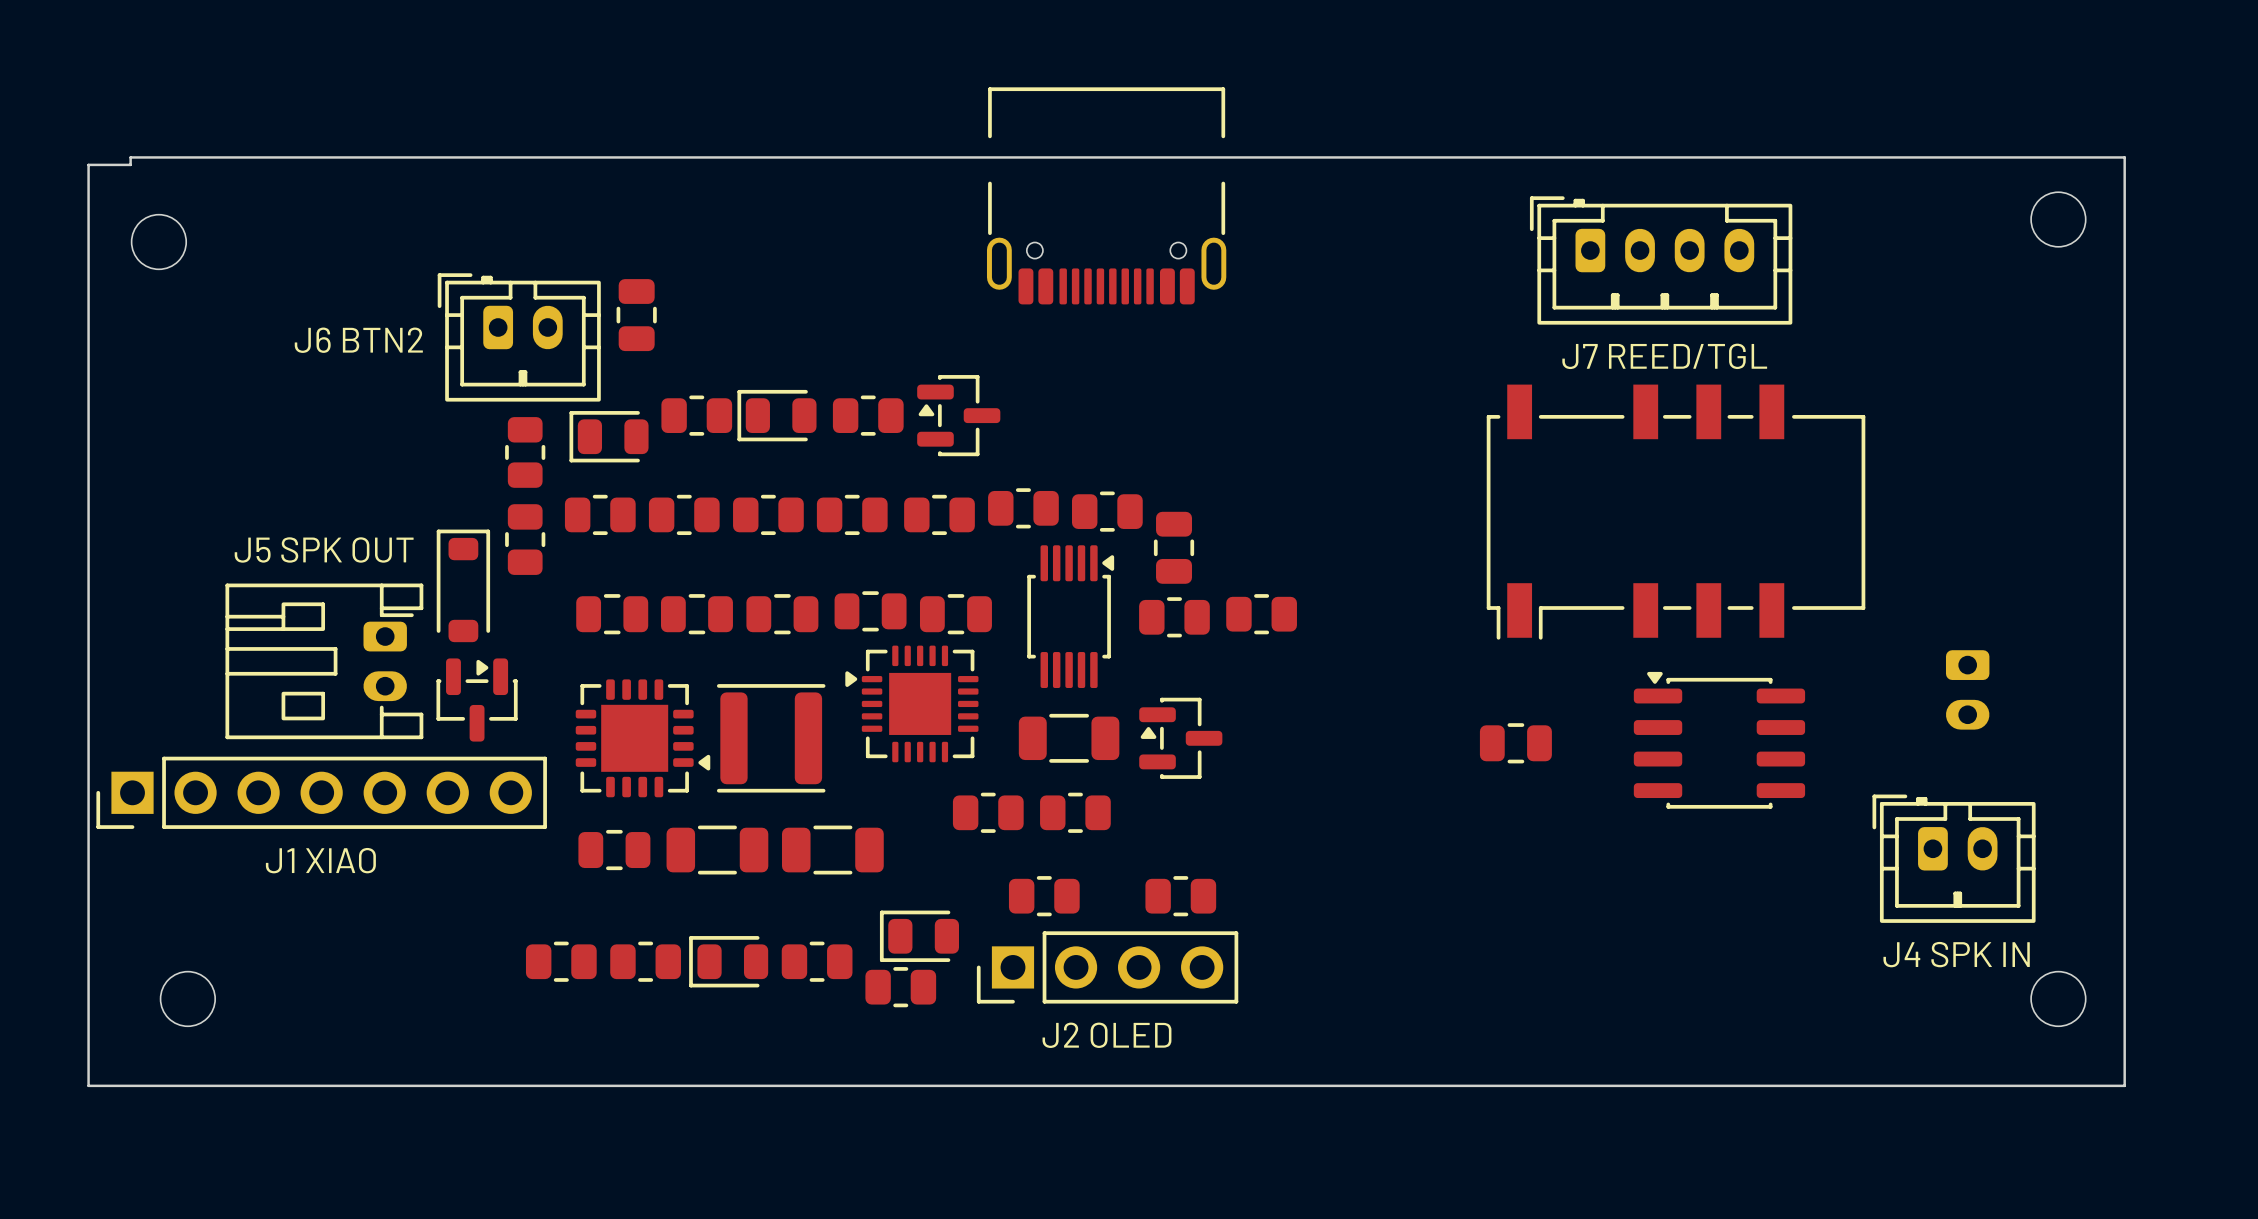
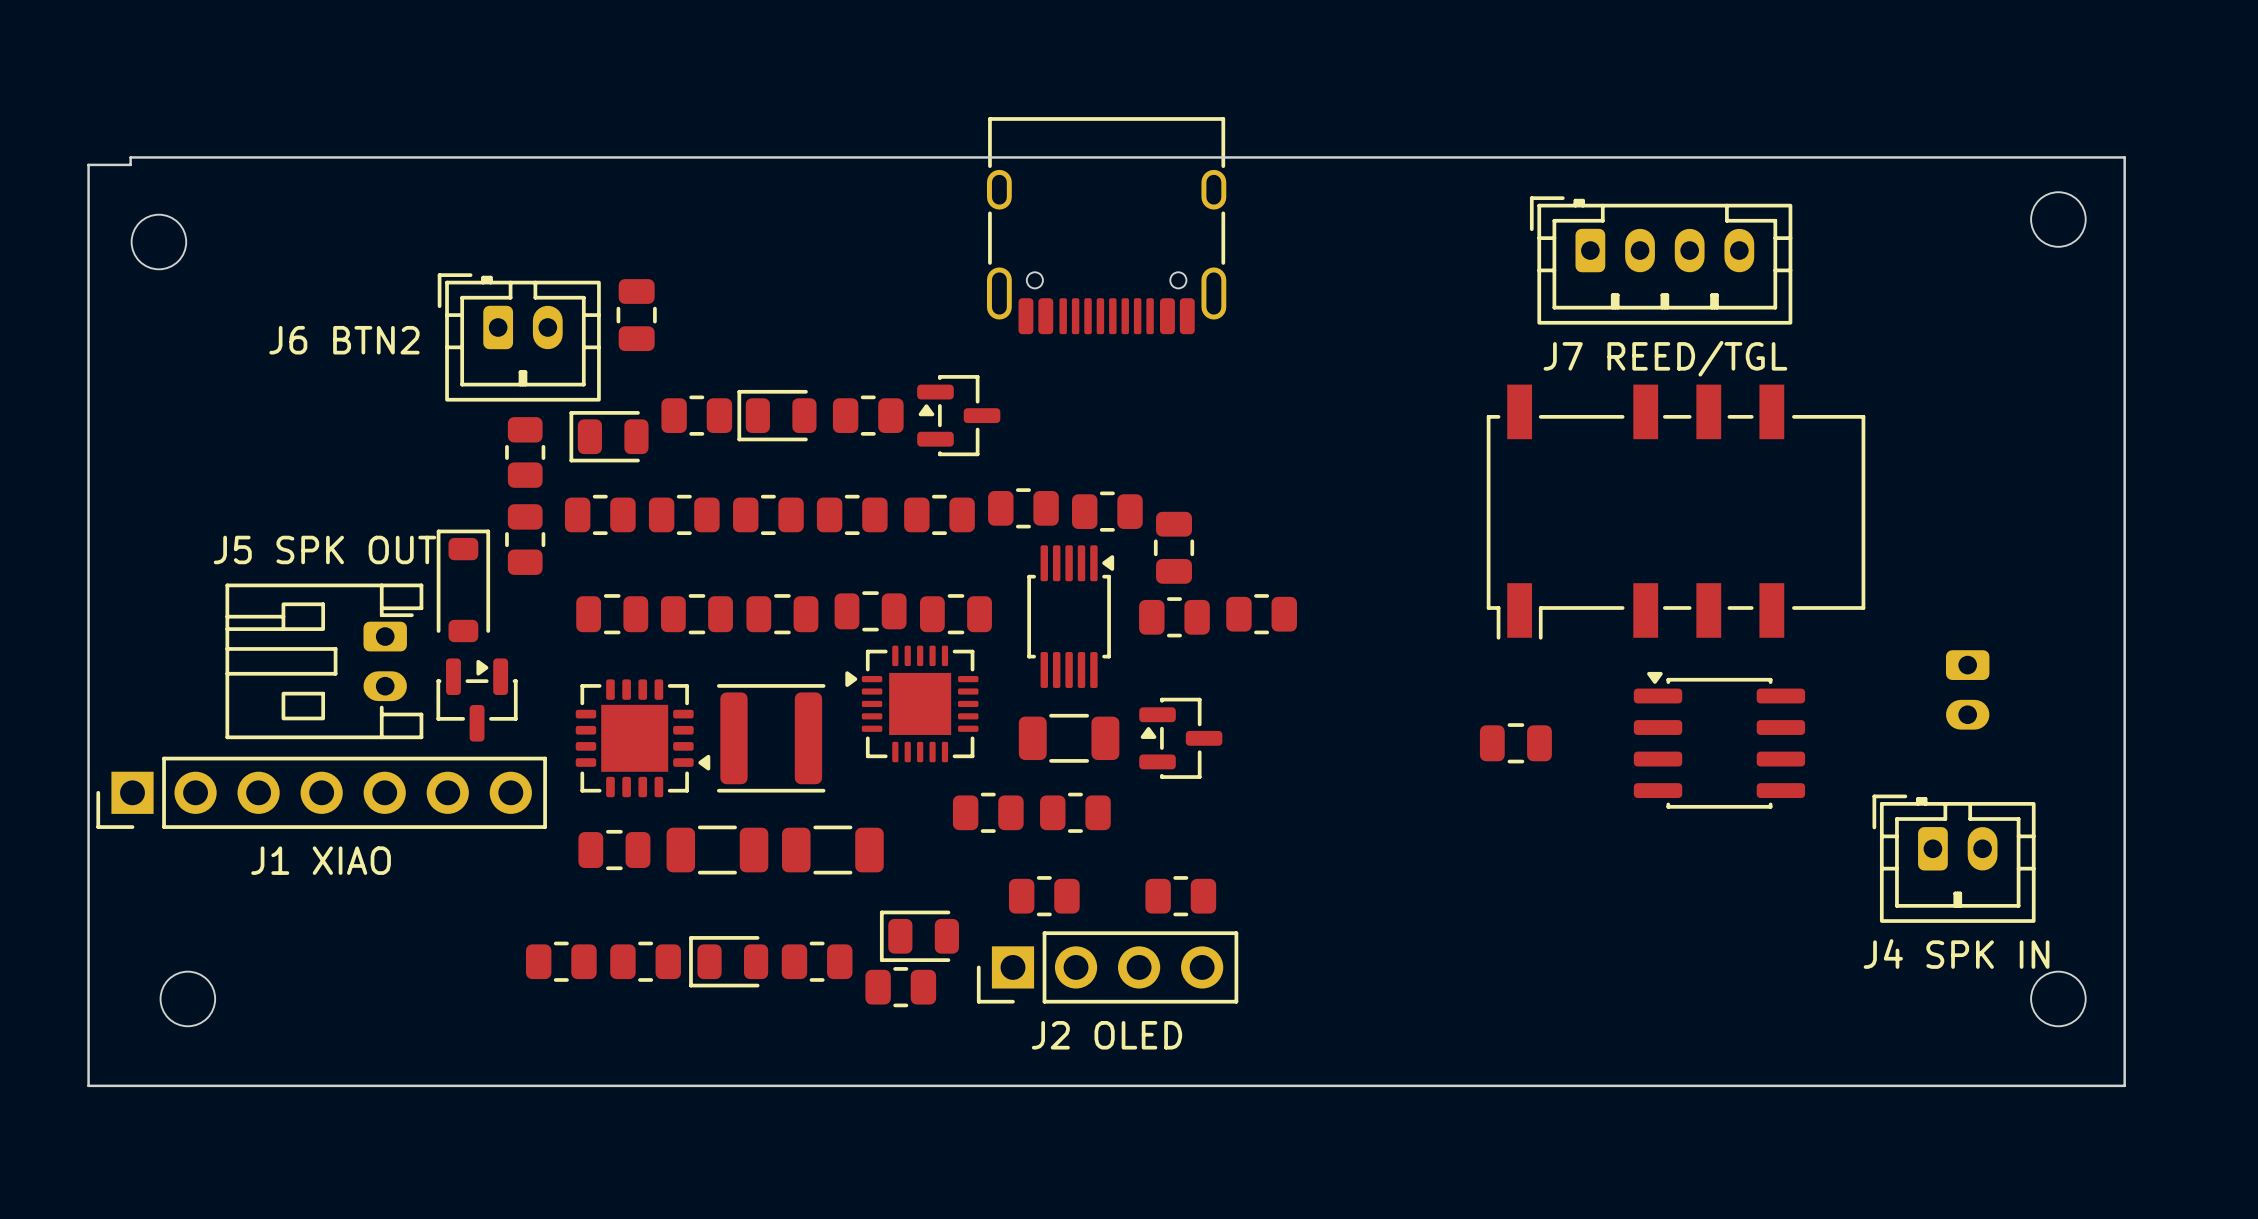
part: (1106, 195) -> none
part: none -> (1106, 225)

